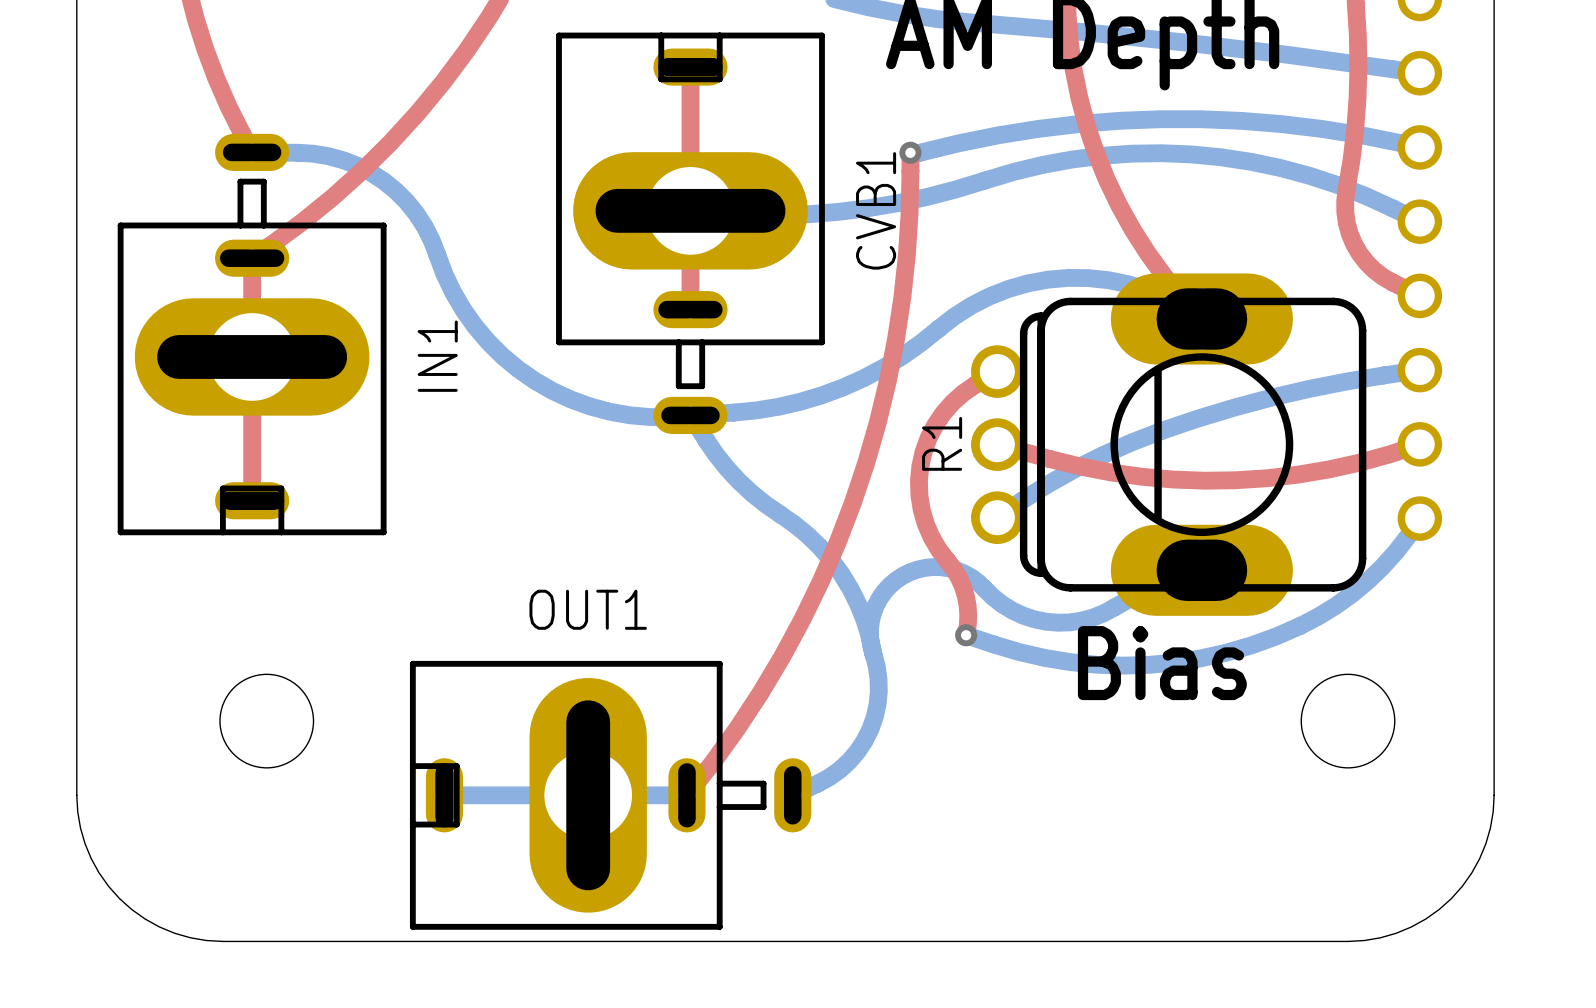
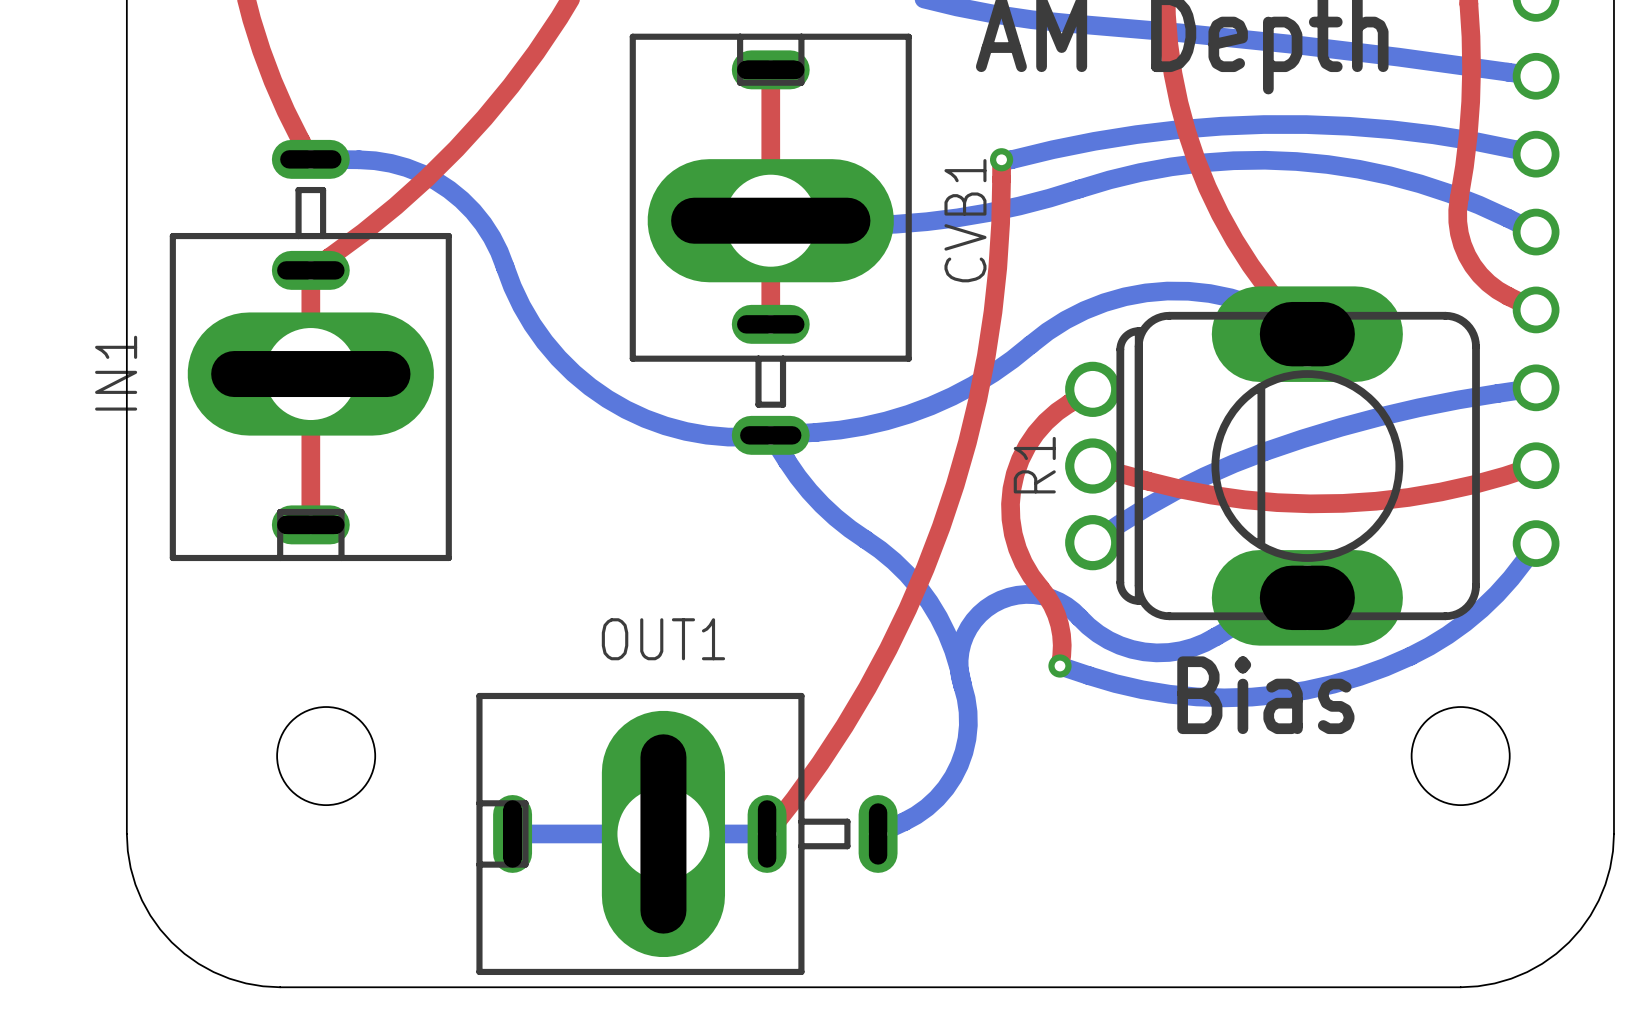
IN1 name position: IN1 (437, 356) -> IN1 (116, 373)

